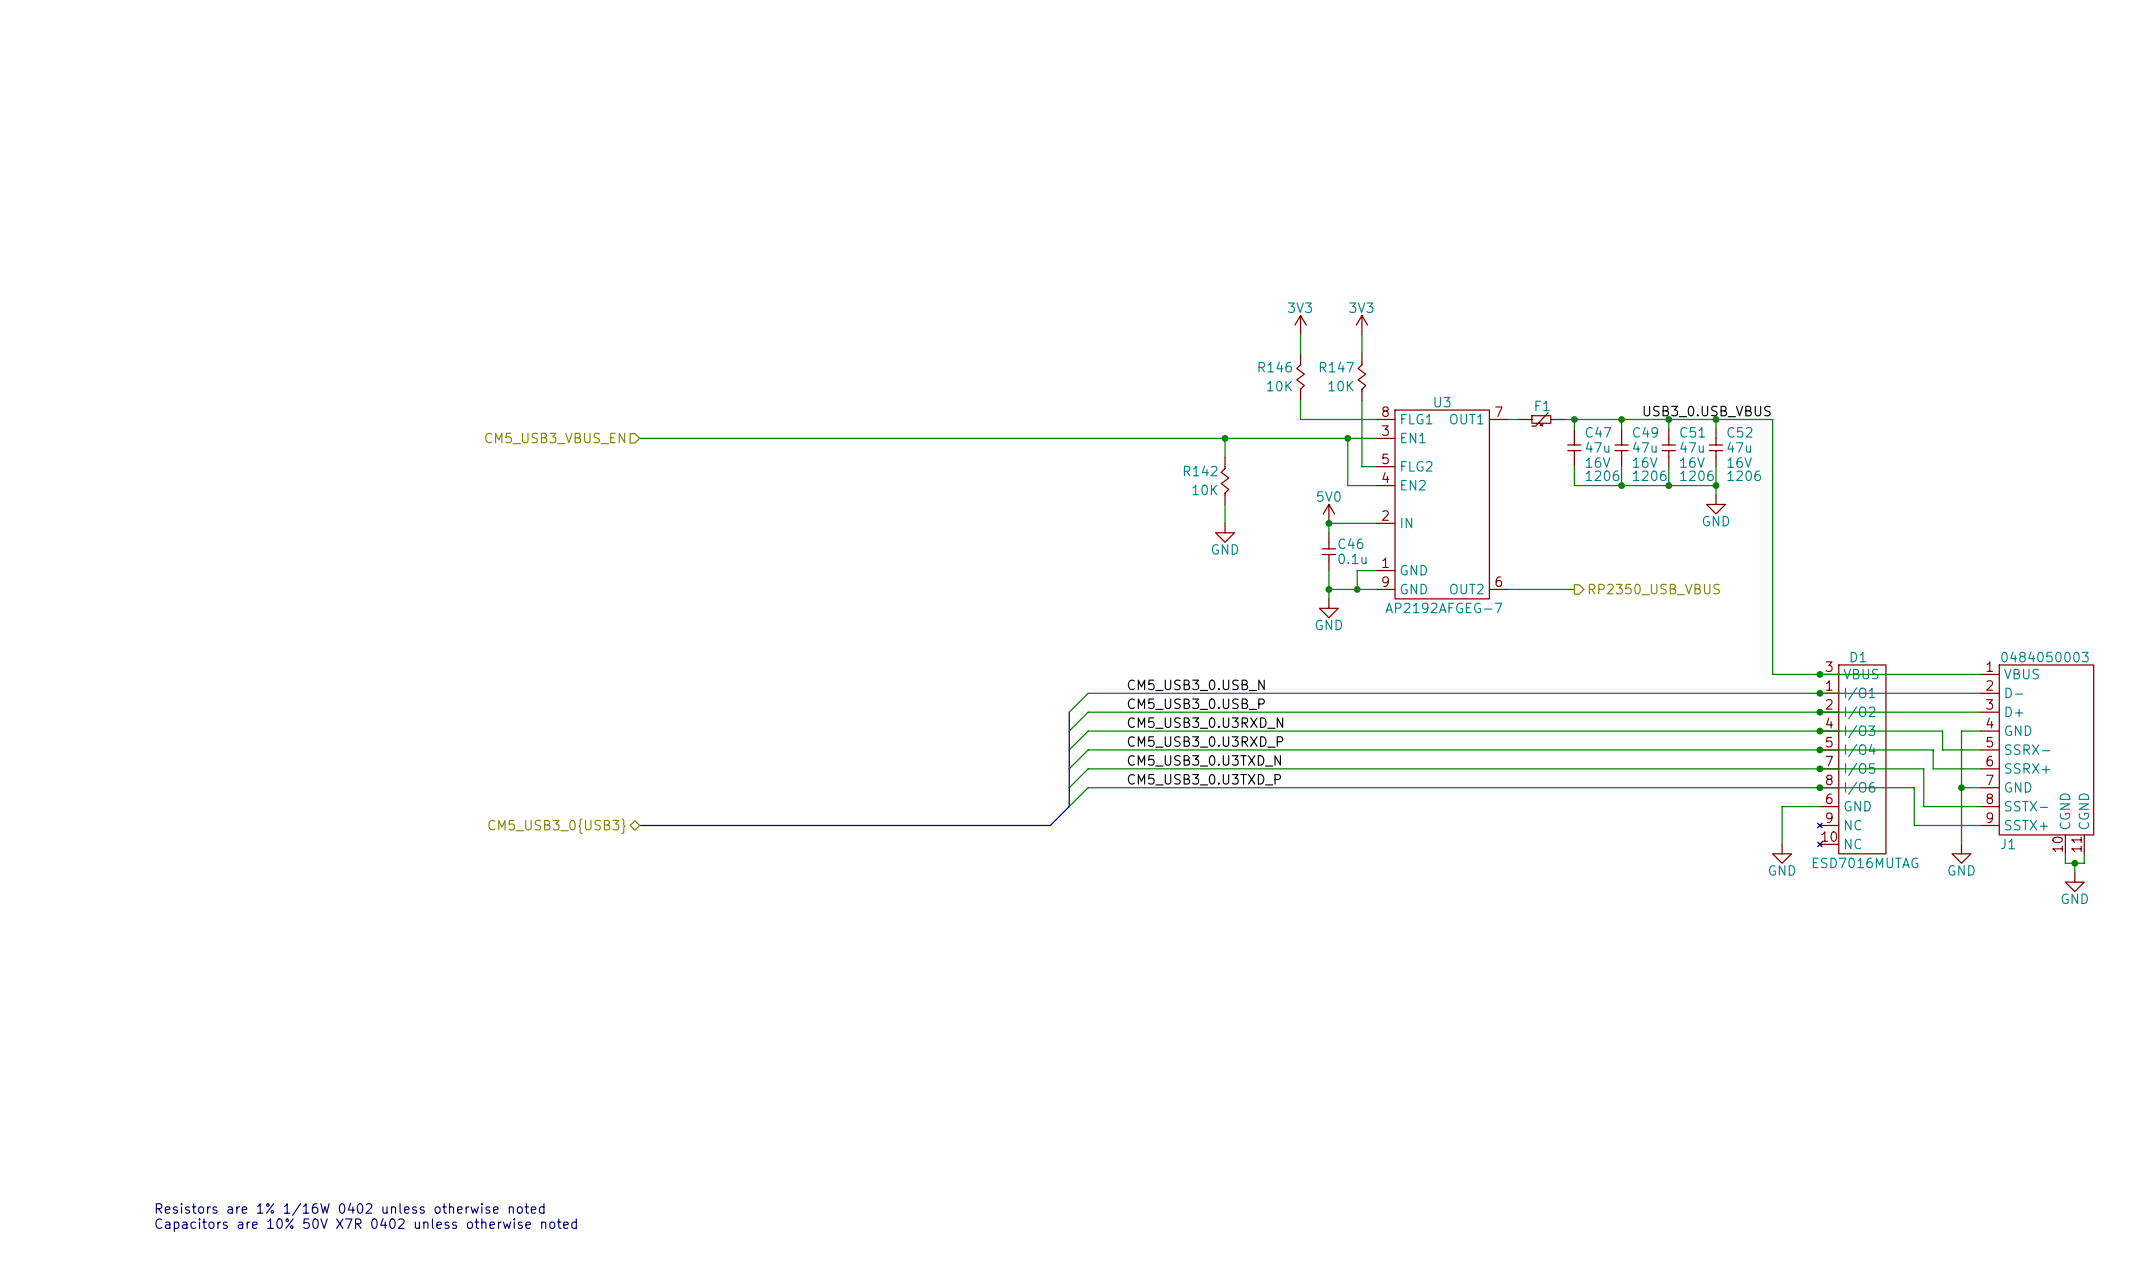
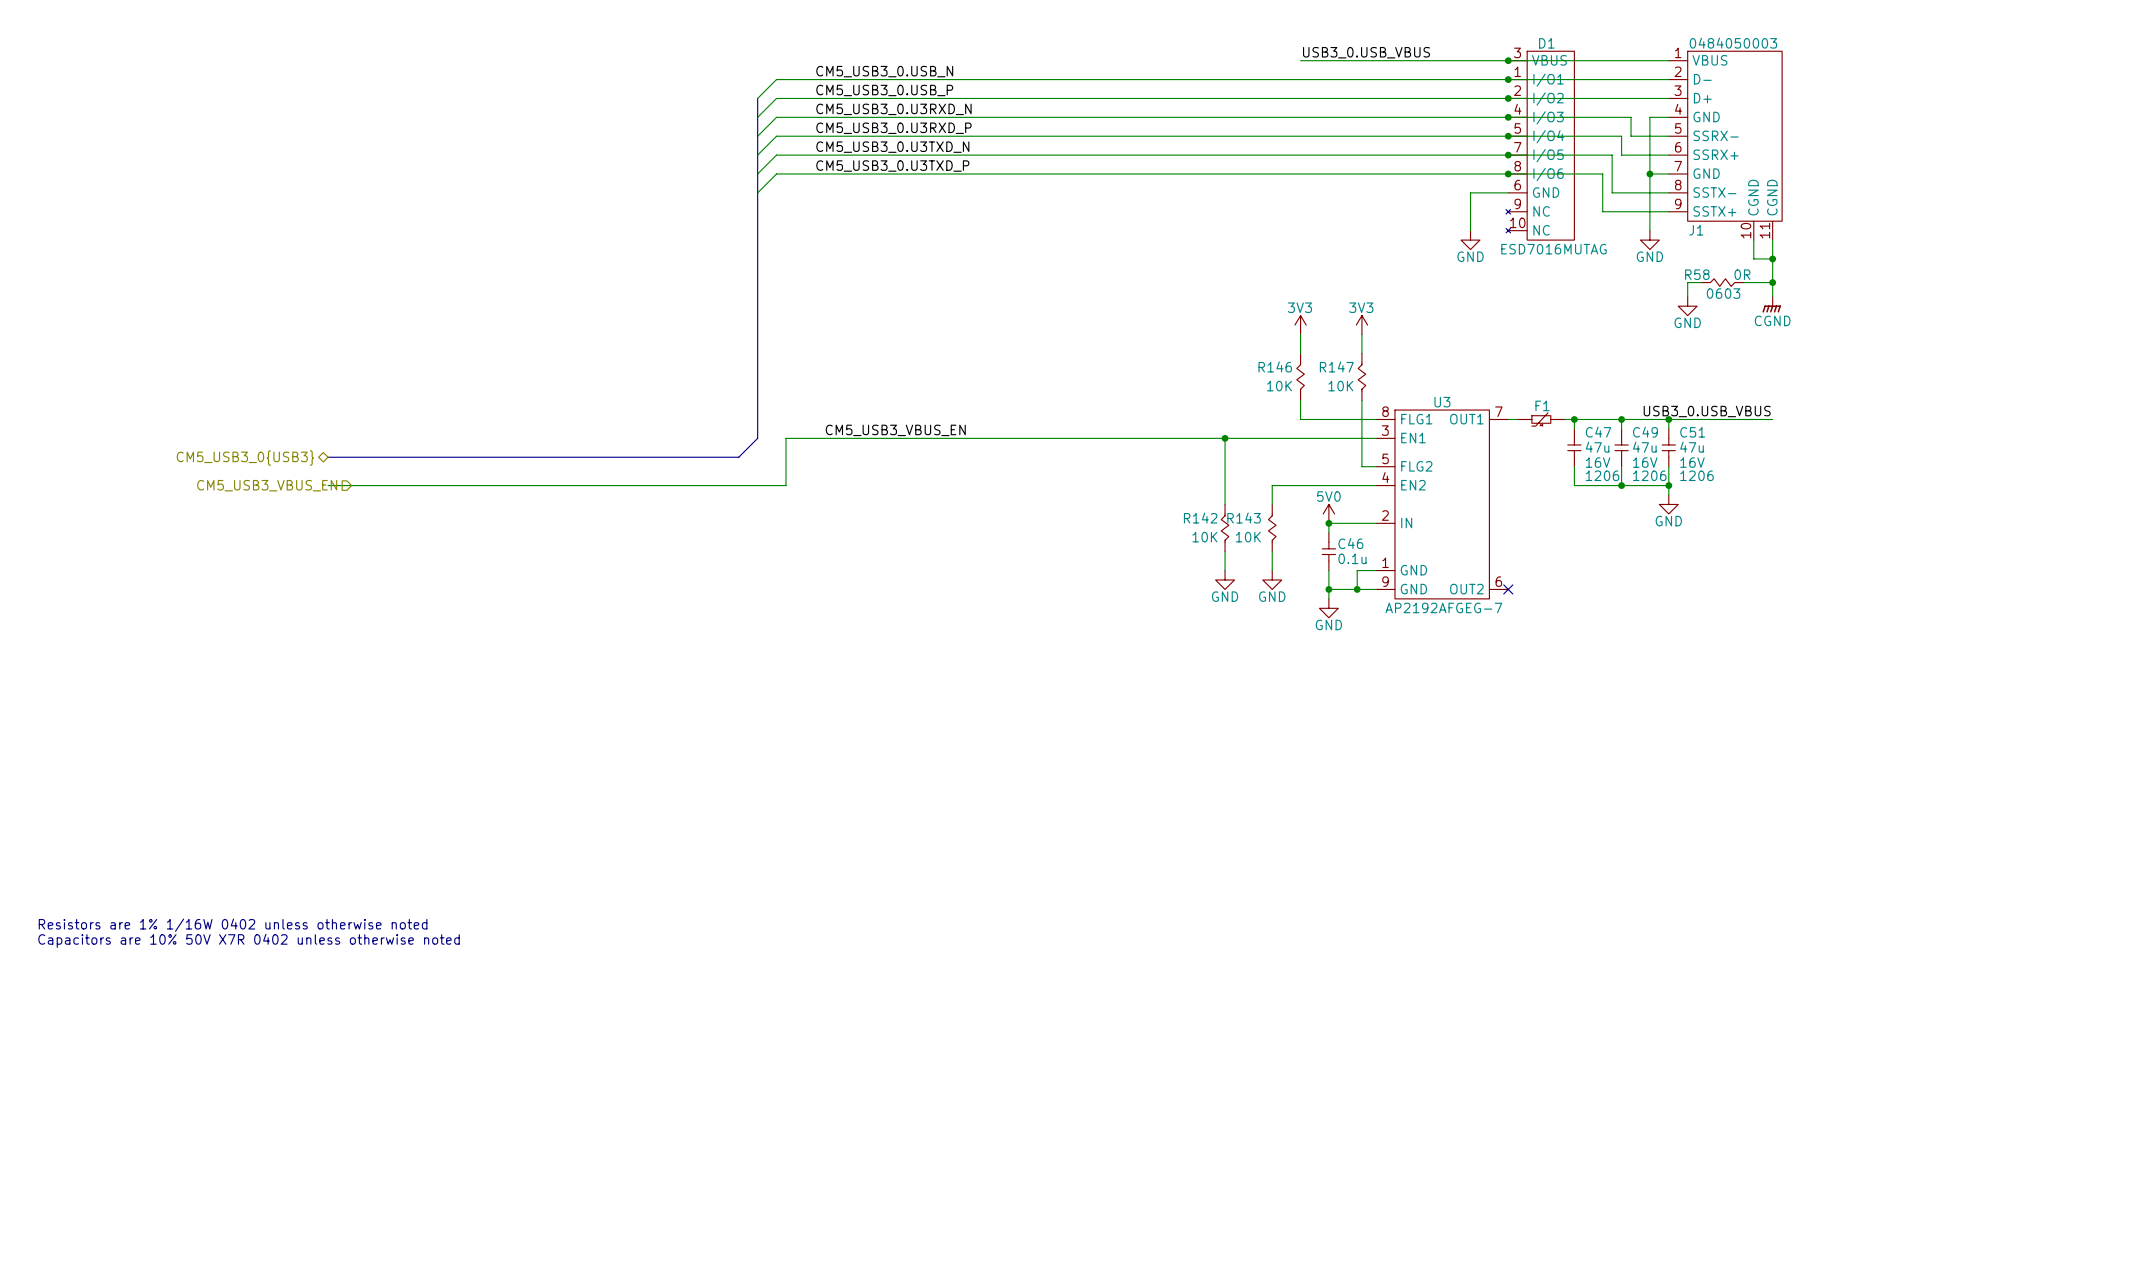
label: none -> USB3_0.USB_VBUS (1366, 52)
wire: none -> (1300, 60) (1668, 60)
junction: none -> (1508, 60)
label: none -> CM5_USB3_0.USB_N (884, 71)
wire: none -> (776, 79) (1668, 79)
wire: none -> (776, 79) (757, 98)
junction: none -> (1508, 79)
label: none -> CM5_USB3_0.USB_P (884, 90)
bus: none -> (757, 98) (757, 438) (738, 457) (328, 457)
wire: none -> (776, 98) (1668, 98)
wire: none -> (776, 98) (757, 117)
junction: none -> (1508, 98)
label: none -> CM5_USB3_0.U3RXD_N (893, 109)
wire: none -> (776, 117) (1631, 117) (1631, 136) (1668, 136)
wire: none -> (776, 117) (757, 136)
junction: none -> (1508, 117)
wire: none -> (1668, 117) (1649, 117) (1649, 230)
label: none -> CM5_USB3_0.U3RXD_P (893, 128)
wire: none -> (776, 136) (1621, 136) (1621, 155) (1668, 155)
wire: none -> (776, 136) (757, 155)
junction: none -> (1508, 136)
label: none -> CM5_USB3_0.U3TXD_N (892, 147)
wire: none -> (776, 155) (757, 173)
wire: none -> (776, 155) (1612, 155) (1612, 192) (1668, 192)
junction: none -> (1508, 155)
label: none -> CM5_USB3_0.U3TXD_P (892, 166)
wire: none -> (776, 173) (1602, 173) (1602, 211) (1668, 211)
wire: none -> (776, 173) (757, 192)
junction: none -> (1508, 173)
wire: none -> (1649, 173) (1668, 173)
junction: none -> (1649, 173)
wire: none -> (1508, 192) (1470, 192) (1470, 230)
power symbol: none -> GND (1470, 240)
power symbol: none -> GND (1649, 240)
wire: none -> (1753, 240) (1753, 258) (1772, 258)
wire: none -> (1772, 240) (1772, 296)
junction: none -> (1772, 258)
wire: none -> (1700, 282) (1687, 282) (1687, 296)
R58: none -> 0R (1722, 282)
wire: none -> (1744, 282) (1772, 282)
junction: none -> (1772, 282)
power symbol: none -> CGND (1771, 304)
power symbol: none -> GND (1687, 306)
wire: (1716, 419) (1716, 428) -> none
junction: (1716, 419) -> none
wire: (1772, 419) (1772, 674) (1980, 674) -> none
label: none -> CM5_USB3_VBUS_EN (895, 430)
hierarchical label: CM5_USB3_VBUS_EN (555, 438) -> none
wire: (639, 438) (785, 438) -> (328, 485) (785, 485) (785, 438)
wire: (1347, 438) (1347, 485) -> (1272, 504) (1272, 485) (1347, 485)
junction: (1347, 438) -> none
C52: 47u (1716, 447) -> none
hierarchical label: none -> CM5_USB3_0{USB3} (245, 458)
wire: (1716, 466) (1716, 495) -> none
R142 position: (1225, 480) -> (1225, 528)
hierarchical label: none -> CM5_USB3_VBUS_EN (267, 485)
wire: (1668, 485) (1716, 485) -> (1668, 485) (1668, 495)
junction: (1716, 485) -> none
power symbol position: GND (1716, 504) -> GND (1668, 504)
R143: none -> 10K (1272, 528)
power symbol: GND (1225, 532) -> none
wire: none -> (1225, 551) (1225, 570)
wire: none -> (1272, 551) (1272, 570)
power symbol: none -> GND (1225, 580)
power symbol: none -> GND (1272, 580)
wire: (1508, 589) (1574, 589) -> none
no-connect mark: none -> (1508, 589)
hierarchical label: RP2350_USB_VBUS (1654, 589) -> none
junction: (1819, 674) -> none
label: CM5_USB3_0.USB_N (1196, 685) -> none
junction: (1819, 693) -> none
wire: (1980, 693) (1088, 693) (1069, 712) -> none
label: CM5_USB3_0.USB_P (1196, 704) -> none
bus: (1069, 712) (1069, 806) (1050, 825) (639, 825) -> none
junction: (1819, 712) -> none
wire: (1980, 712) (1088, 712) (1069, 731) -> none
label: CM5_USB3_0.U3RXD_N (1205, 723) -> none
junction: (1819, 731) -> none
wire: (1980, 731) (1961, 731) (1961, 844) -> none
label: CM5_USB3_0.U3RXD_P (1205, 741) -> none
wire: (1069, 749) (1088, 731) (1942, 731) (1942, 749) (1980, 749) -> none
junction: (1819, 749) -> none
D1 position: (1851, 759) -> (1540, 145)
J1 position: (2037, 759) -> (1725, 145)
label: CM5_USB3_0.U3TXD_N (1204, 760) -> none
wire: (1069, 768) (1088, 749) (1933, 749) (1933, 768) (1980, 768) -> none
junction: (1819, 768) -> none
label: CM5_USB3_0.U3TXD_P (1204, 779) -> none
wire: (1069, 787) (1088, 768) (1923, 768) (1923, 806) (1980, 806) -> none
junction: (1819, 787) -> none
wire: (1961, 787) (1980, 787) -> none
junction: (1961, 787) -> none
wire: (1069, 806) (1088, 787) (1914, 787) (1914, 825) (1980, 825) -> none
wire: (1819, 806) (1782, 806) (1782, 844) -> none
hierarchical label: CM5_USB3_0{USB3} (556, 826) -> none
power symbol: GND (1782, 853) -> none
power symbol: GND (1961, 853) -> none
wire: (2065, 853) (2065, 863) (2084, 863) (2084, 853) -> none
wire: (2074, 863) (2074, 872) -> none
junction: (2074, 863) -> none
power symbol: GND (2074, 882) -> none
text: none -> Resistors are 1% 1/16W 0402 unless otherwise noted (233, 925)
text: none -> Capacitors are 10% 50V X7R 0402 unless otherwise noted (249, 940)
text: Resistors are 1% 1/16W 0402 unless otherwise noted (350, 1209) -> none
text: Capacitors are 10% 50V X7R 0402 unless otherwise noted (366, 1225) -> none

